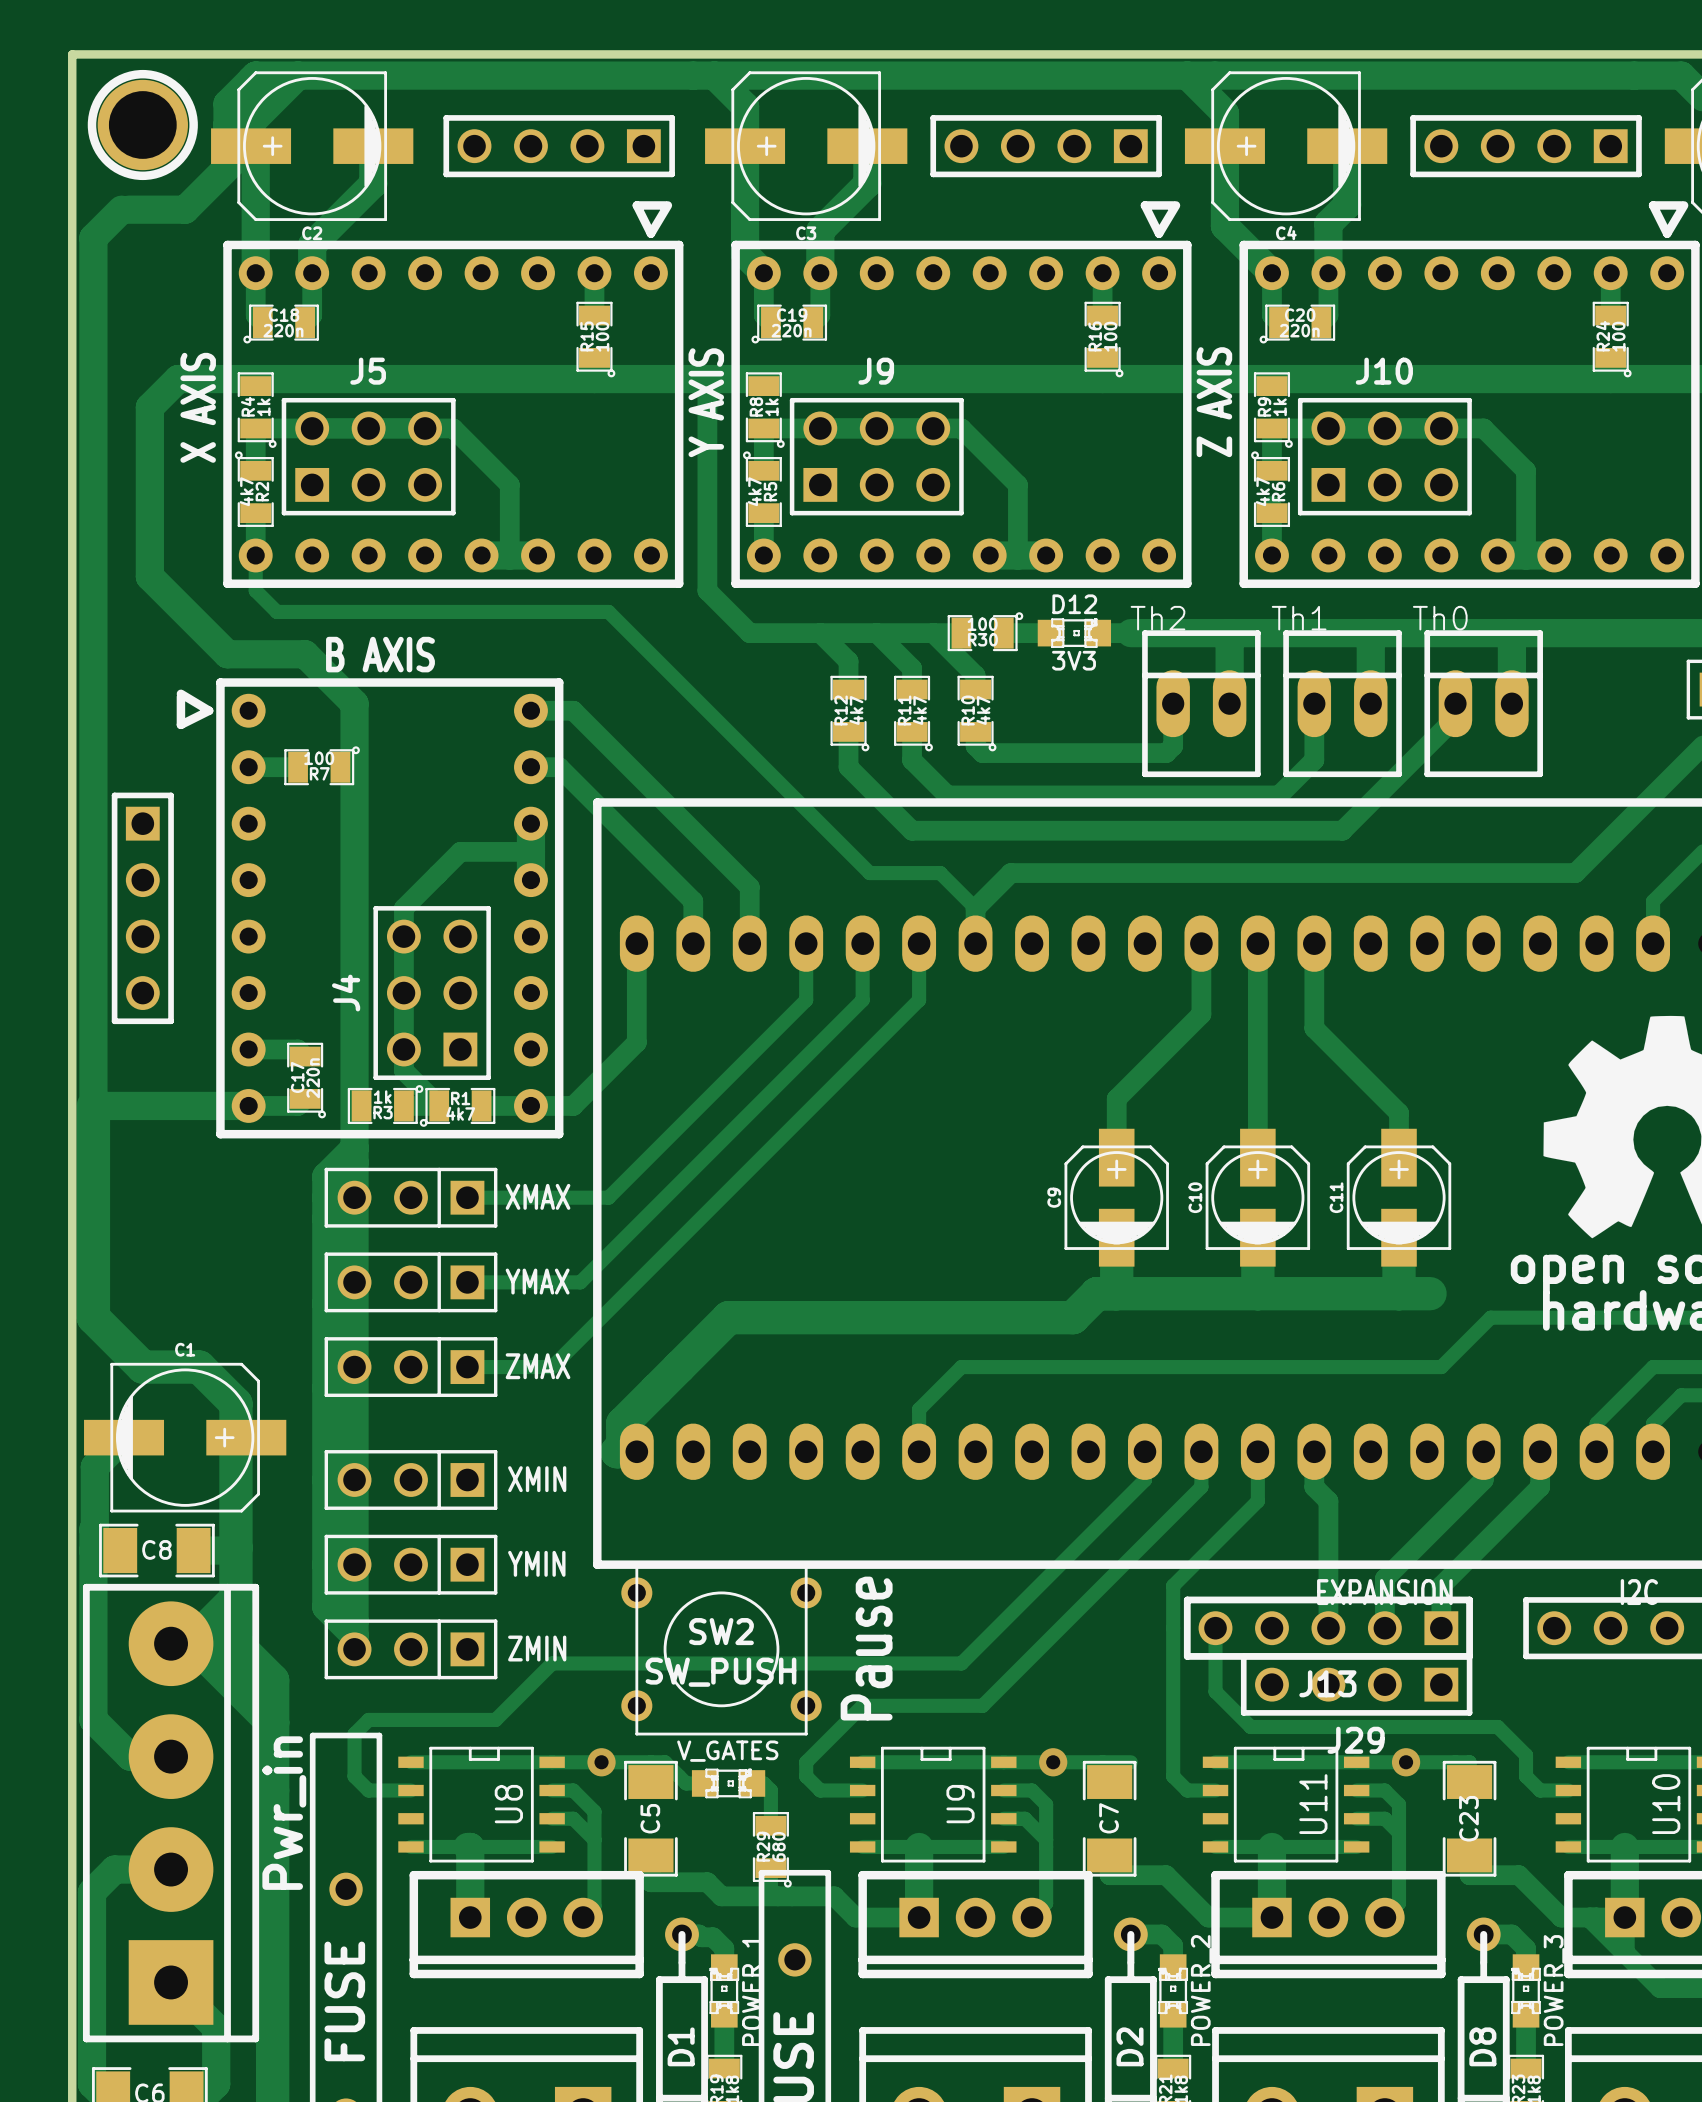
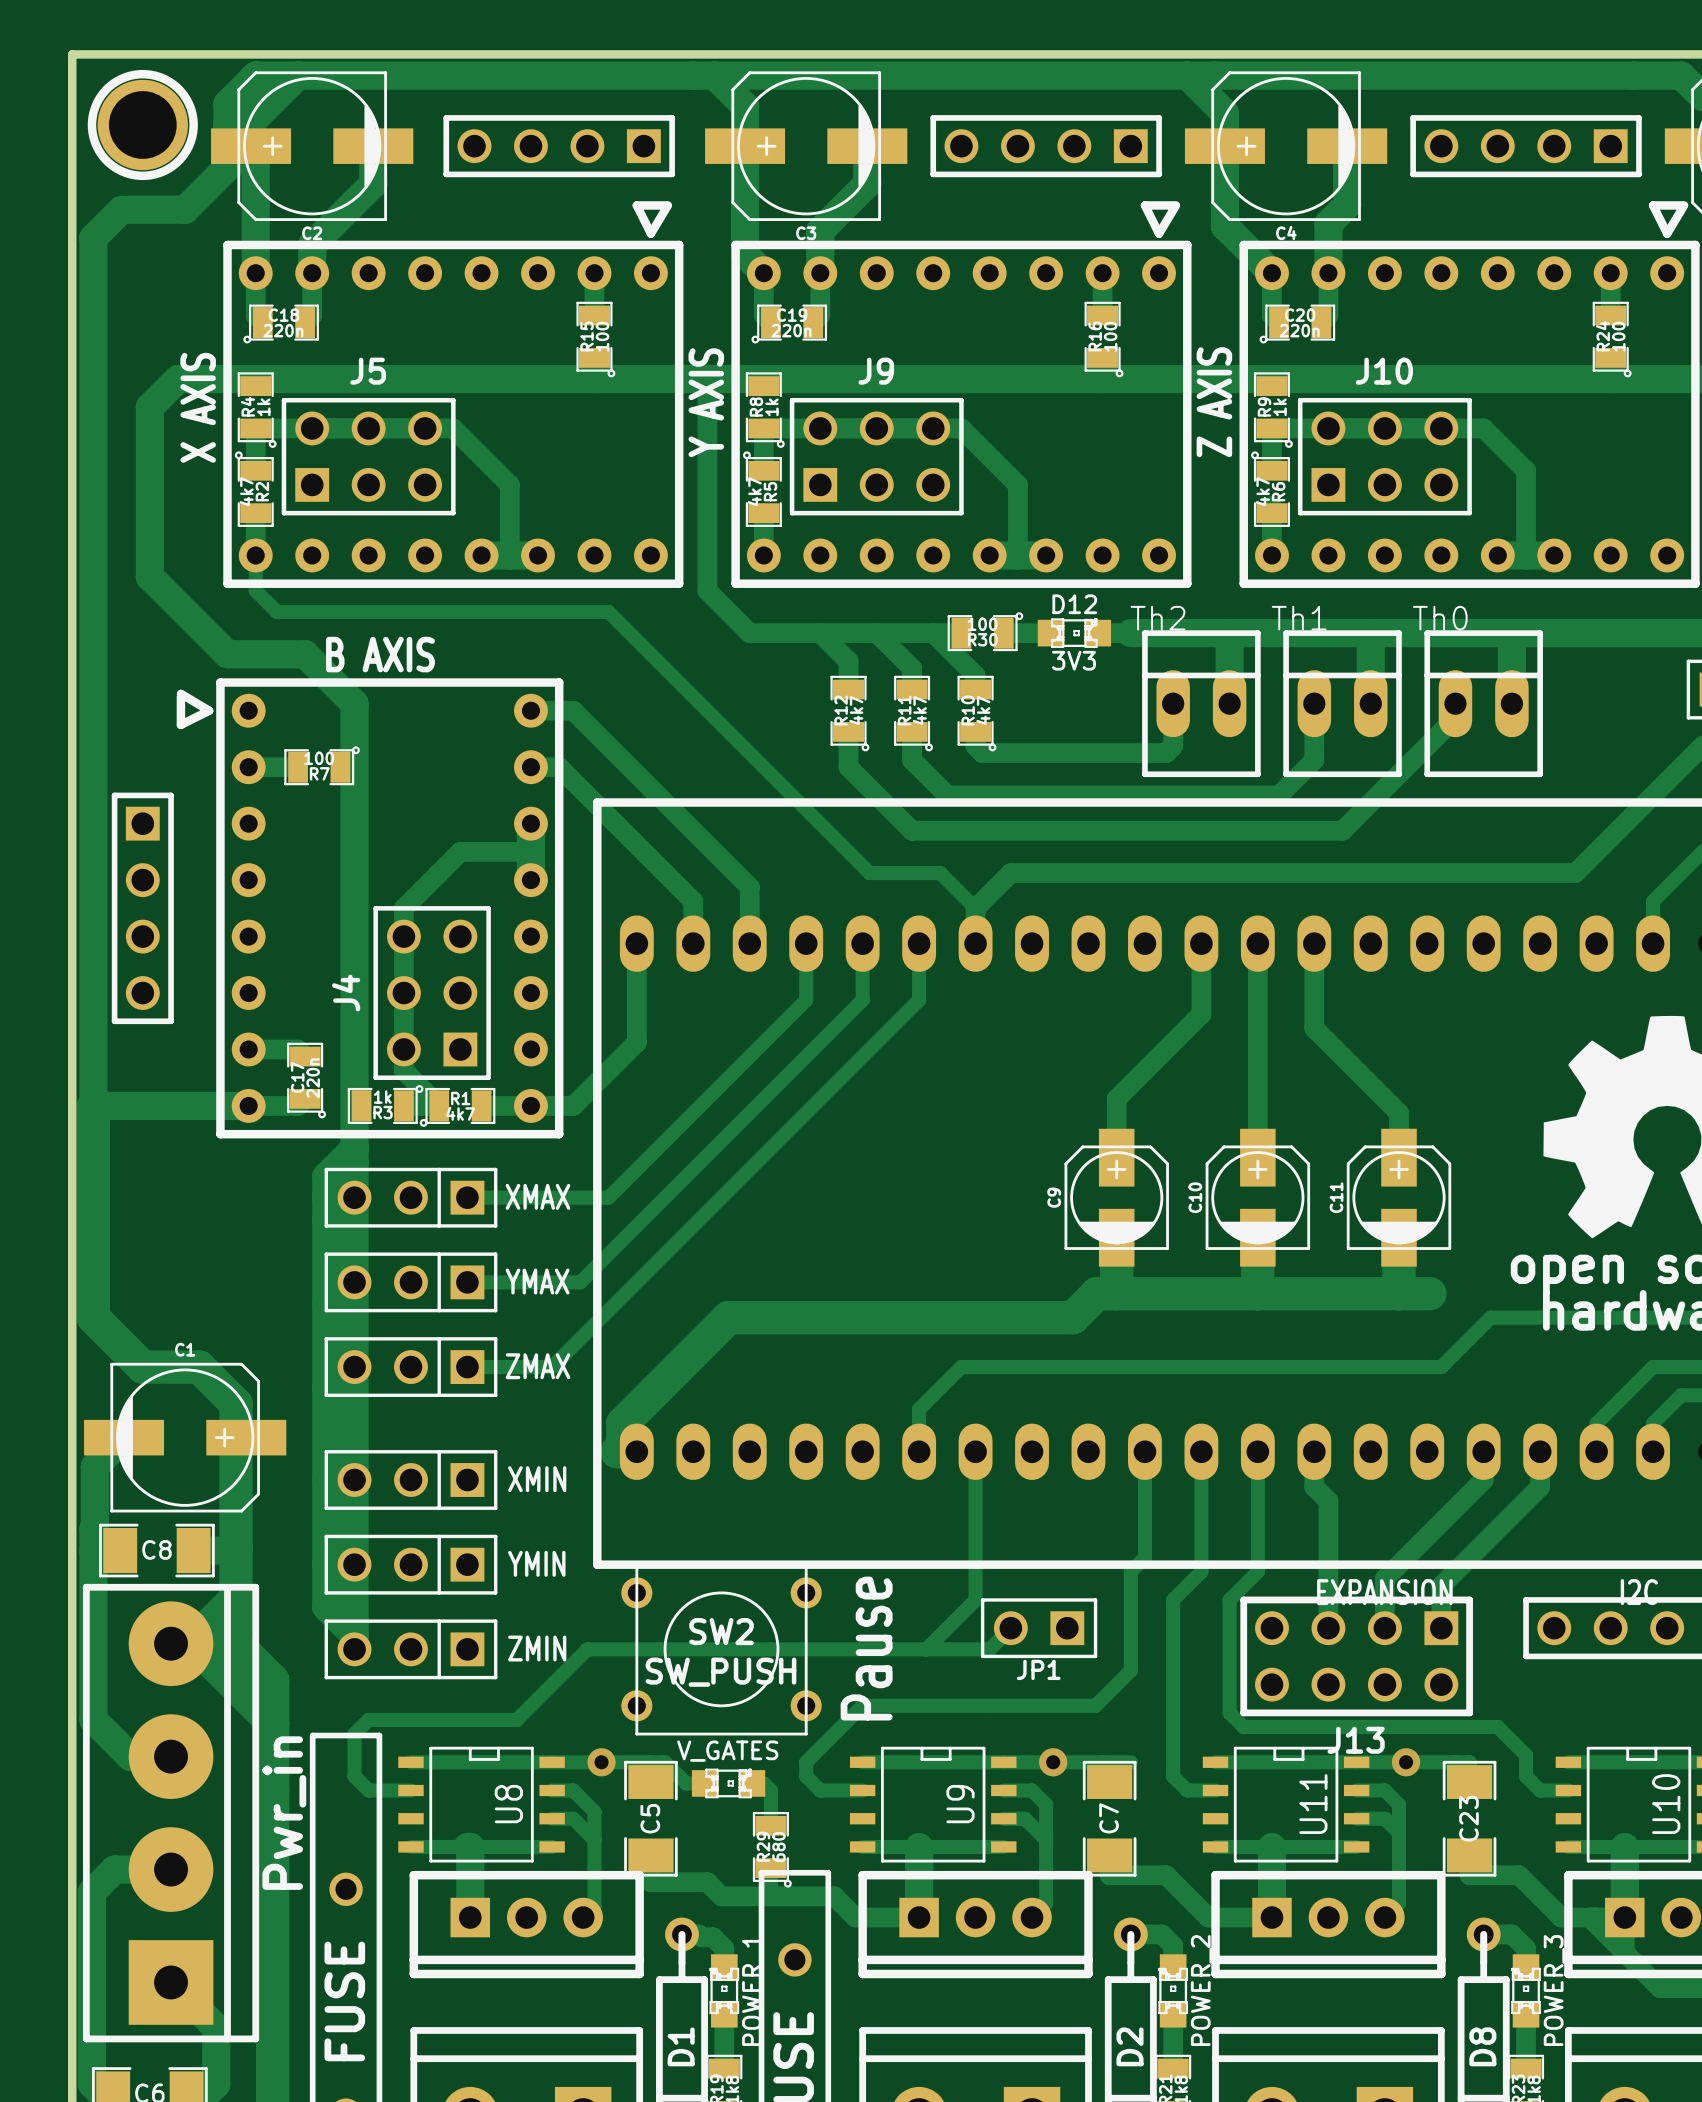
track: none -> (975, 1451) (975, 1599) (926, 1649)
track: (1144, 1479) (961, 1663) (552, 1663) (495, 1719) -> (1010, 1628) (989, 1649) (587, 1649) (516, 1719) (495, 1719)
track: (1201, 1487) (982, 1705) -> (1144, 1479) (1144, 1557) (1130, 1571) (1130, 1670) (1095, 1705) (982, 1705)
track: (1257, 1501) (1173, 1585) (1173, 1599) -> (1201, 1487) (1201, 1571) (1173, 1599)
J13 footprint: [1183, 1596, 1473, 1660] -> [1240, 1596, 1473, 1717]
JP1: none -> (1039, 1628)
track: (1215, 1628) (1215, 1691) (1250, 1726) -> (1257, 1501) (1257, 1571) (1229, 1599) (1229, 1712) (1243, 1726) (1250, 1726)
J29: (1356, 1684) -> none

